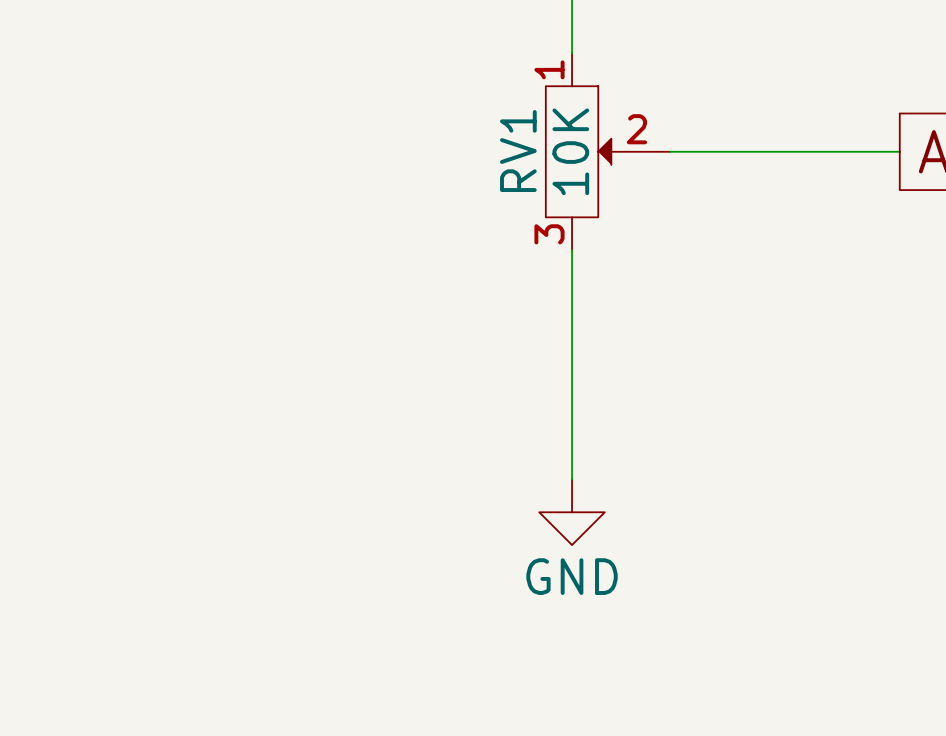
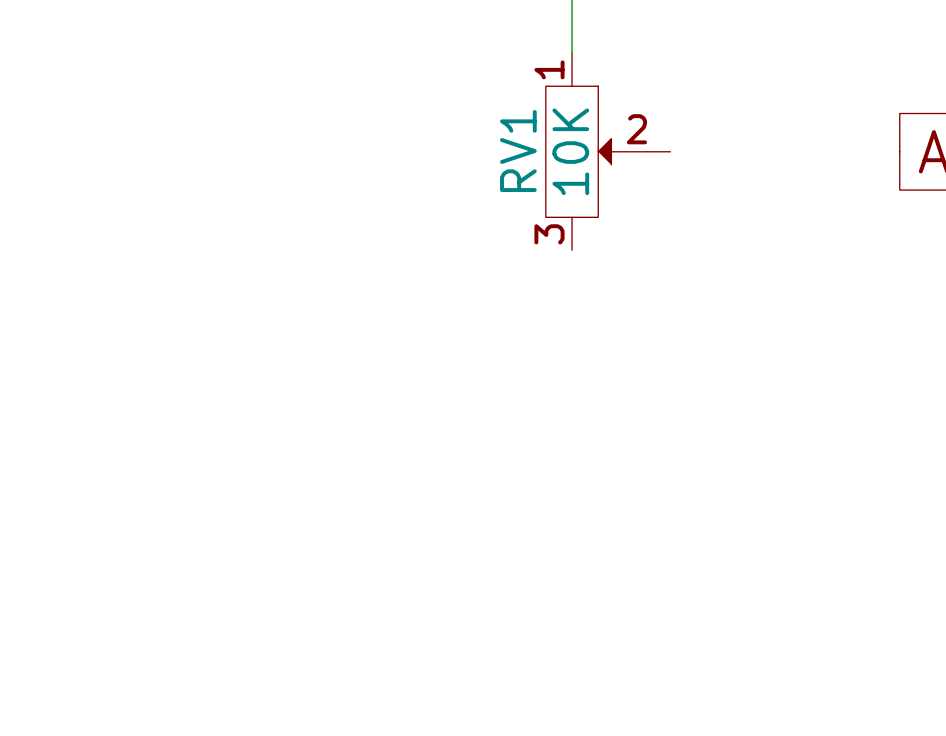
wire: (670, 151) (899, 151) -> none
wire: (572, 250) (572, 479) -> none
power symbol: GND (572, 512) -> none

